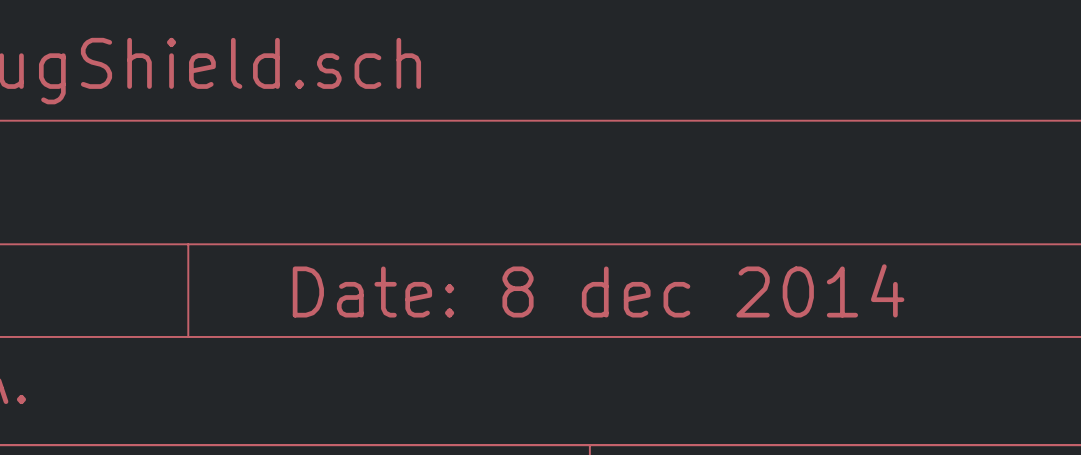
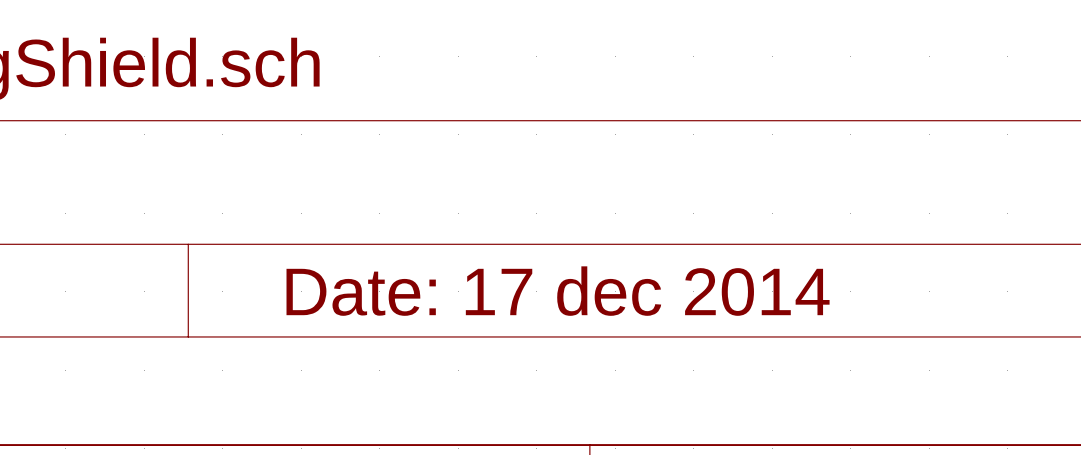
title block: Date: 8 dec 2014 (598, 290) -> Date: 17 dec 2014 (558, 291)

